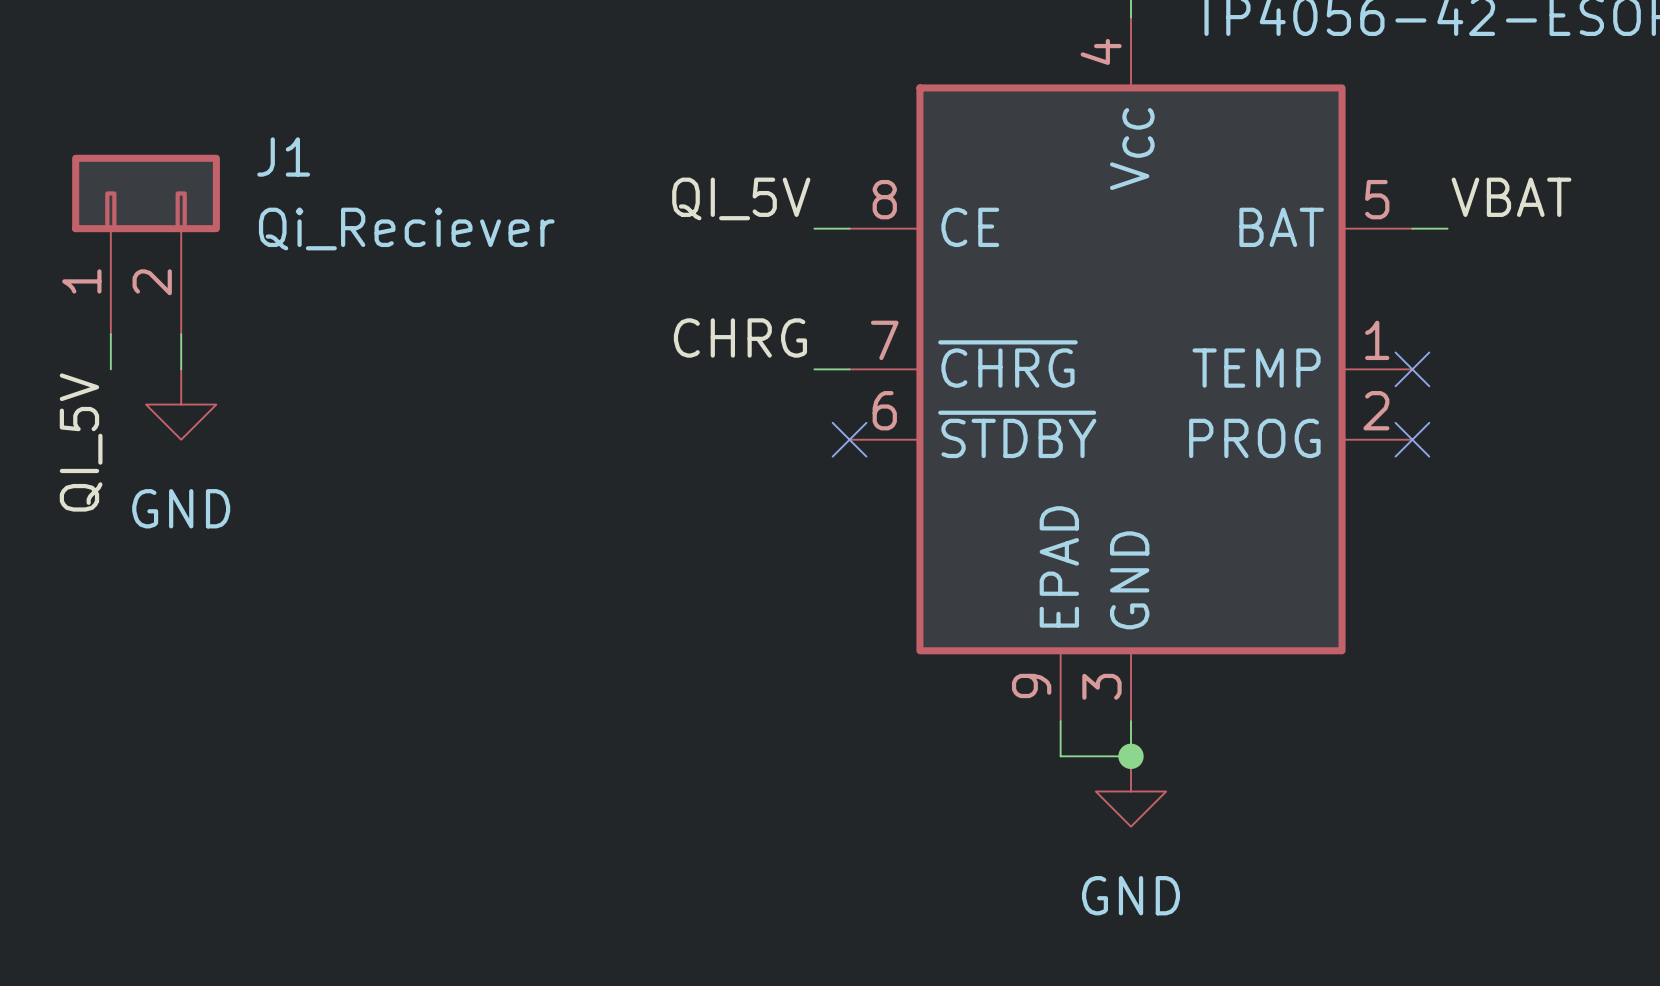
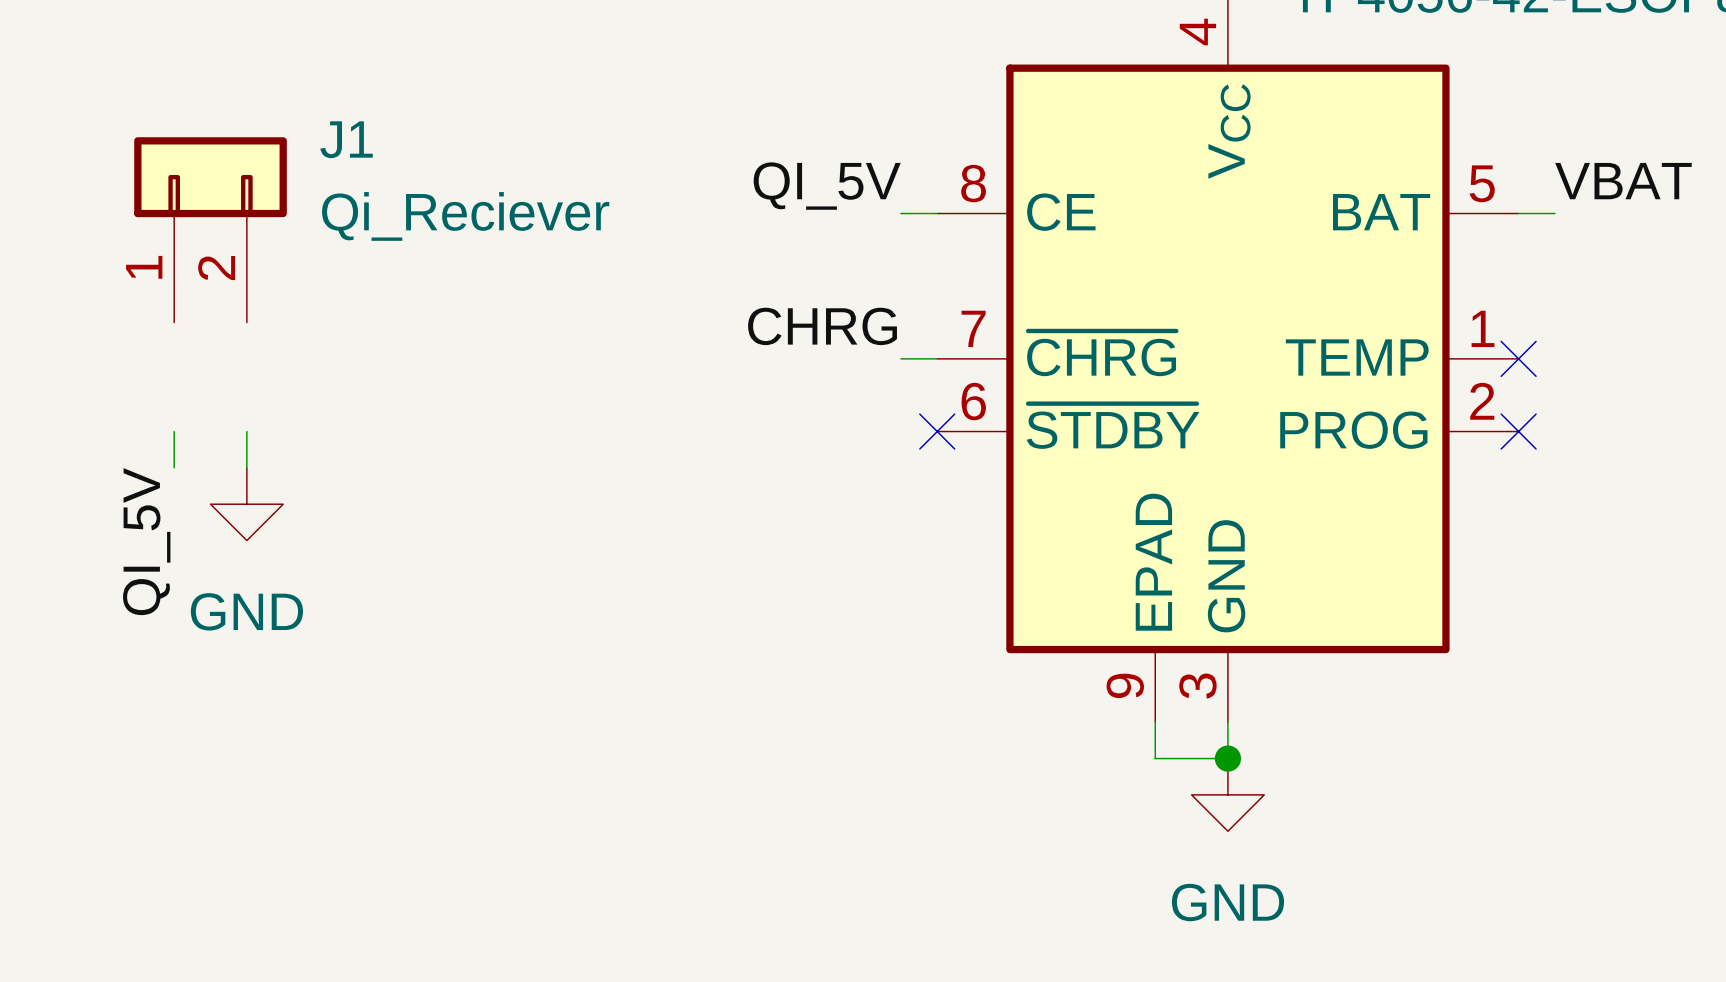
wire: (110, 334) (110, 369) -> (174, 431) (174, 467)
wire: (181, 334) (181, 369) -> (246, 431) (246, 467)
power symbol position: GND (181, 404) -> GND (246, 504)
label position: QI_5V (81, 442) -> QI_5V (146, 541)

